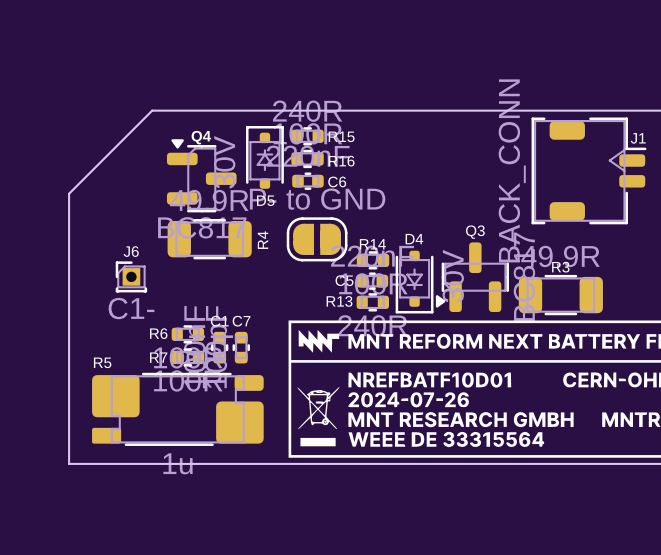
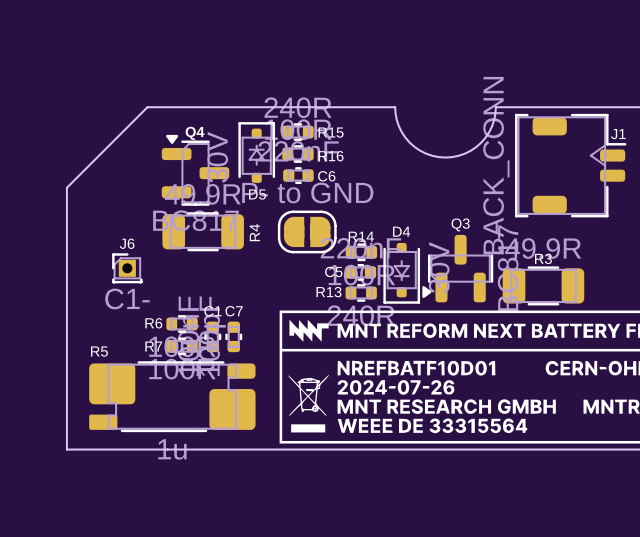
board edge: (407, 110) (511, 110) -> (395, 107) (398, 126) (409, 142) (426, 153) (445, 157) (464, 153) (481, 142) (492, 126) (495, 107)

